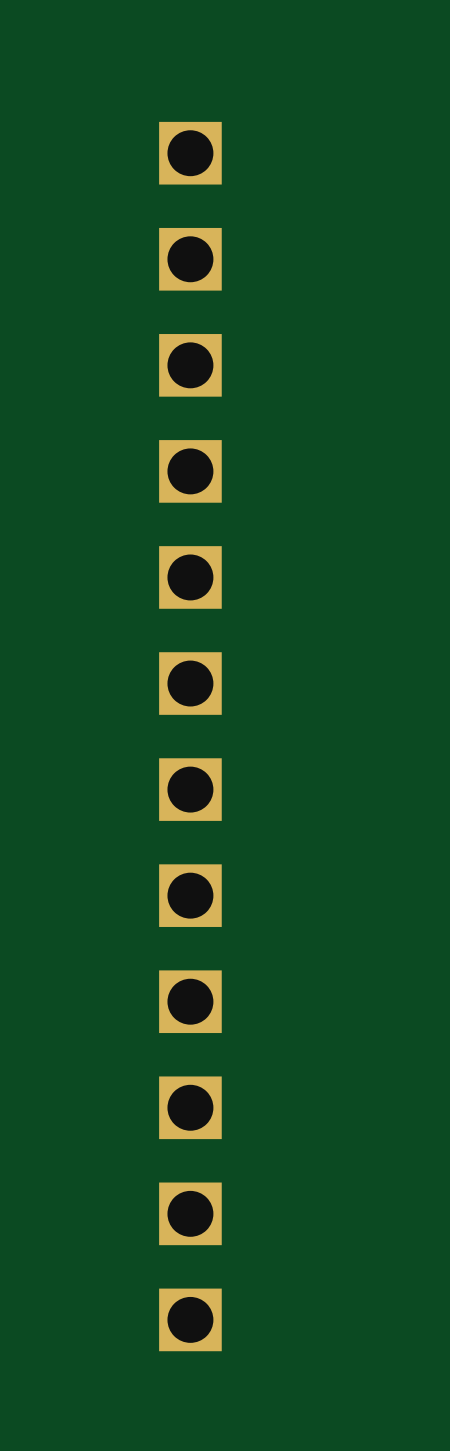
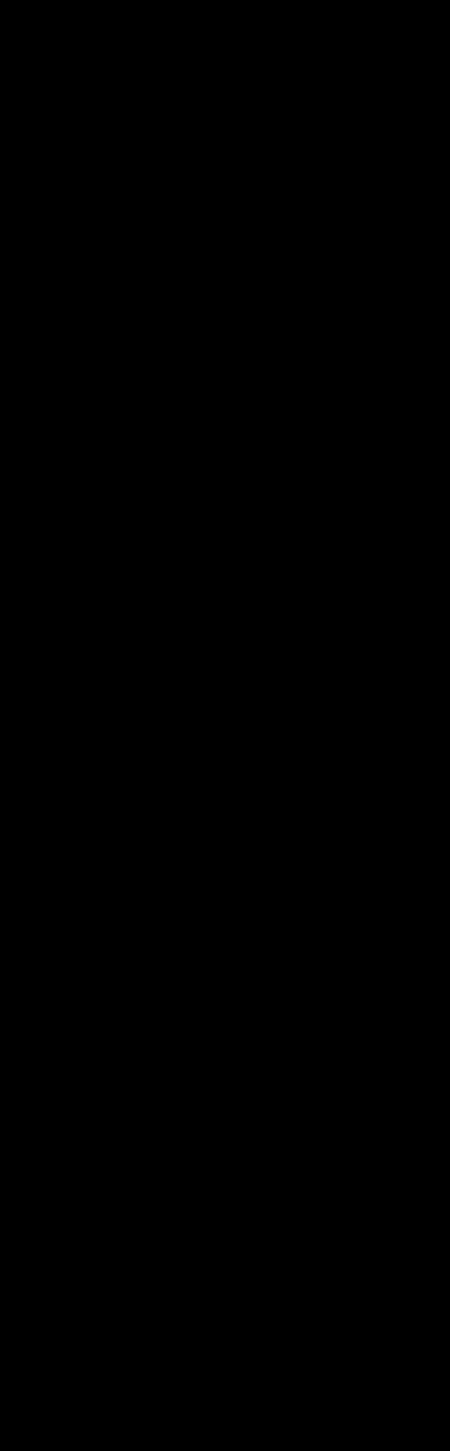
part: (190, 736) -> none

